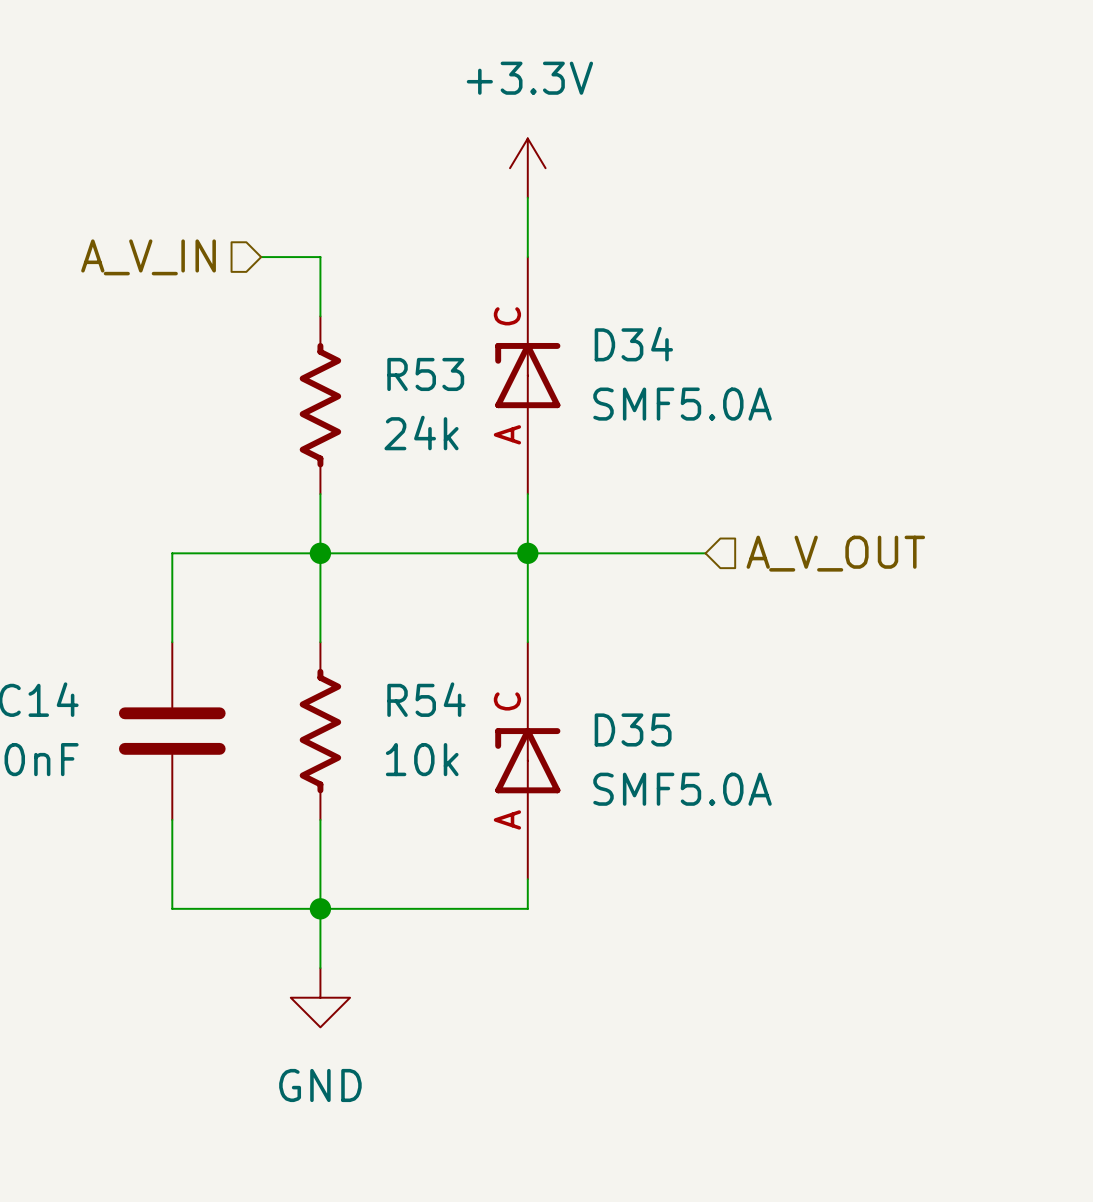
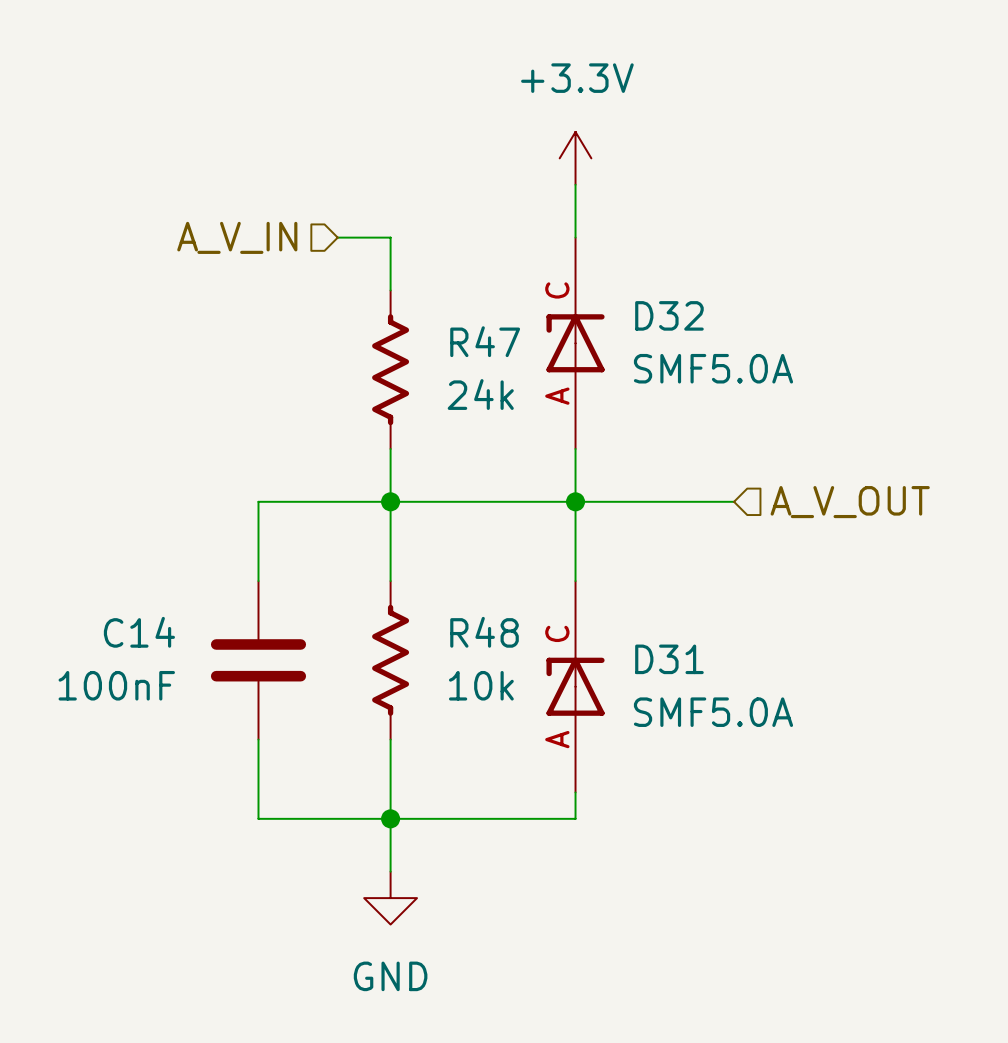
D34 name: D34 (633, 344) -> D32 (669, 315)
R53 name: R53 (425, 374) -> R47 (485, 341)
R54 name: R54 (426, 699) -> R48 (484, 632)
D35 name: D35 (633, 729) -> D31 (669, 659)

